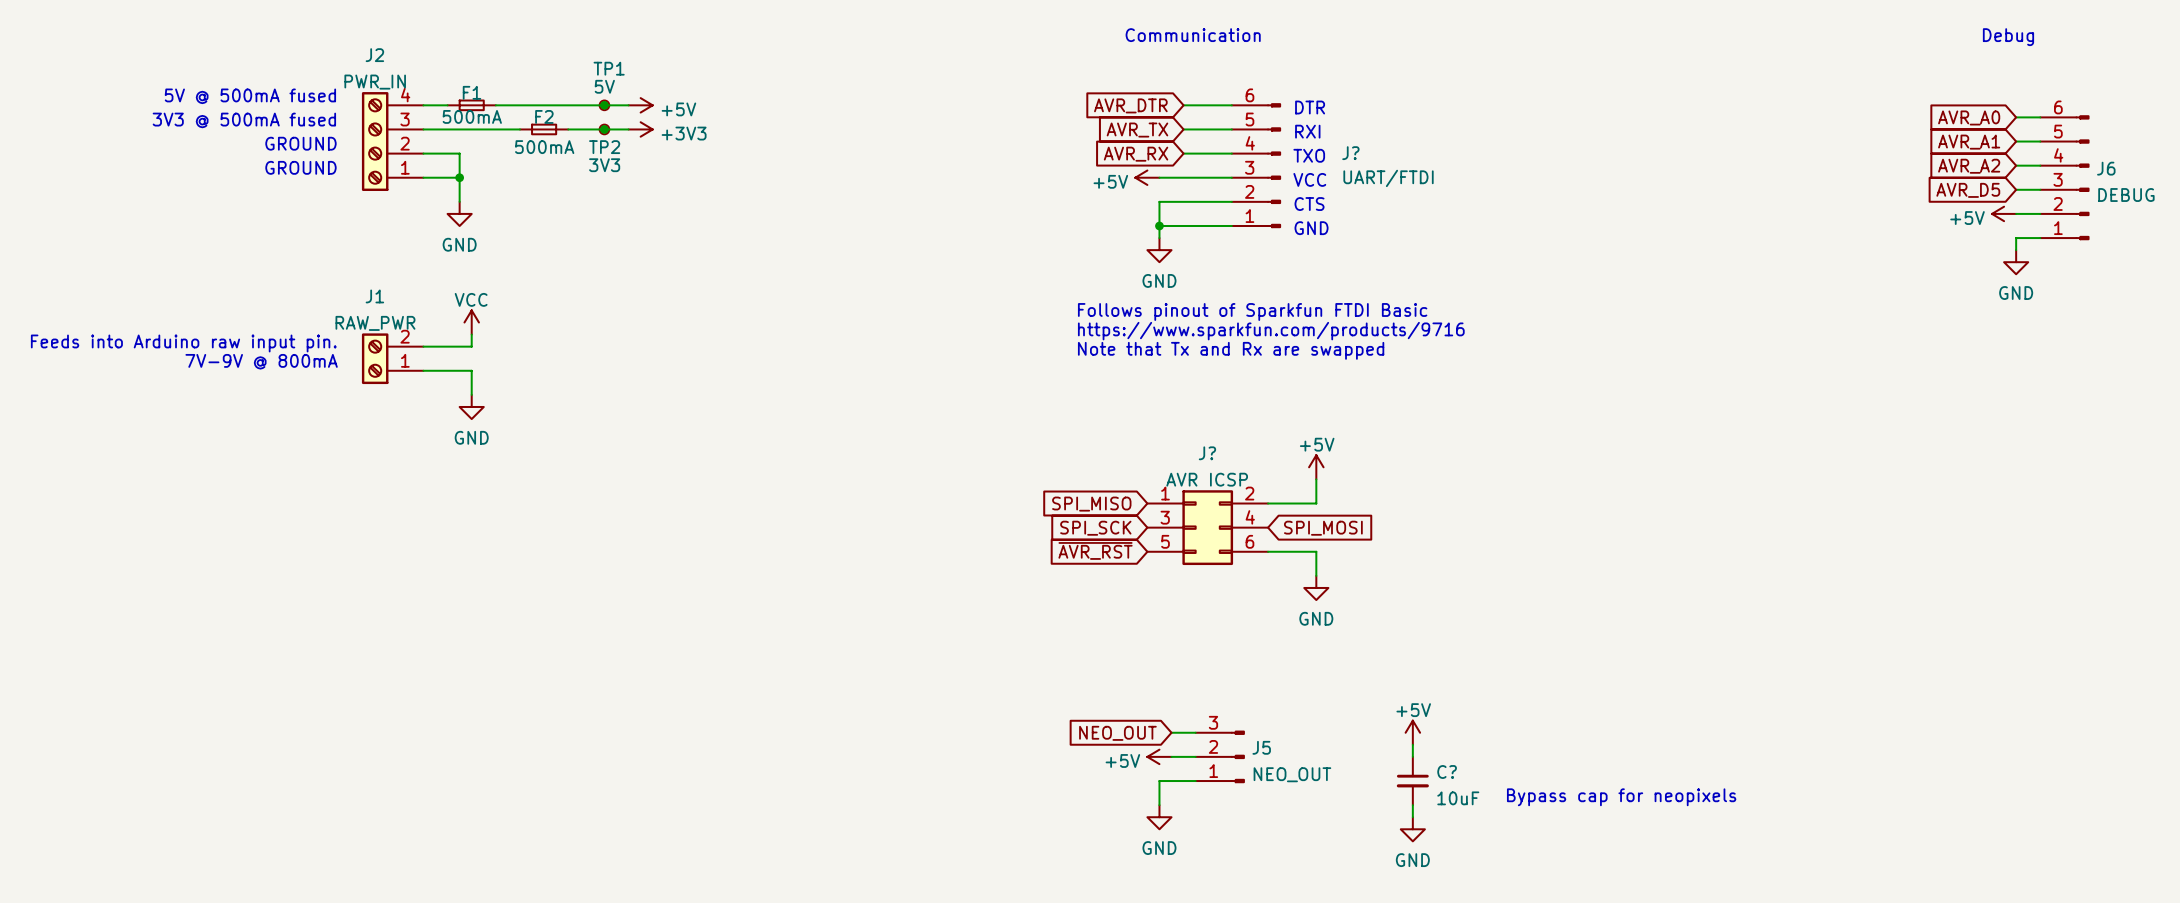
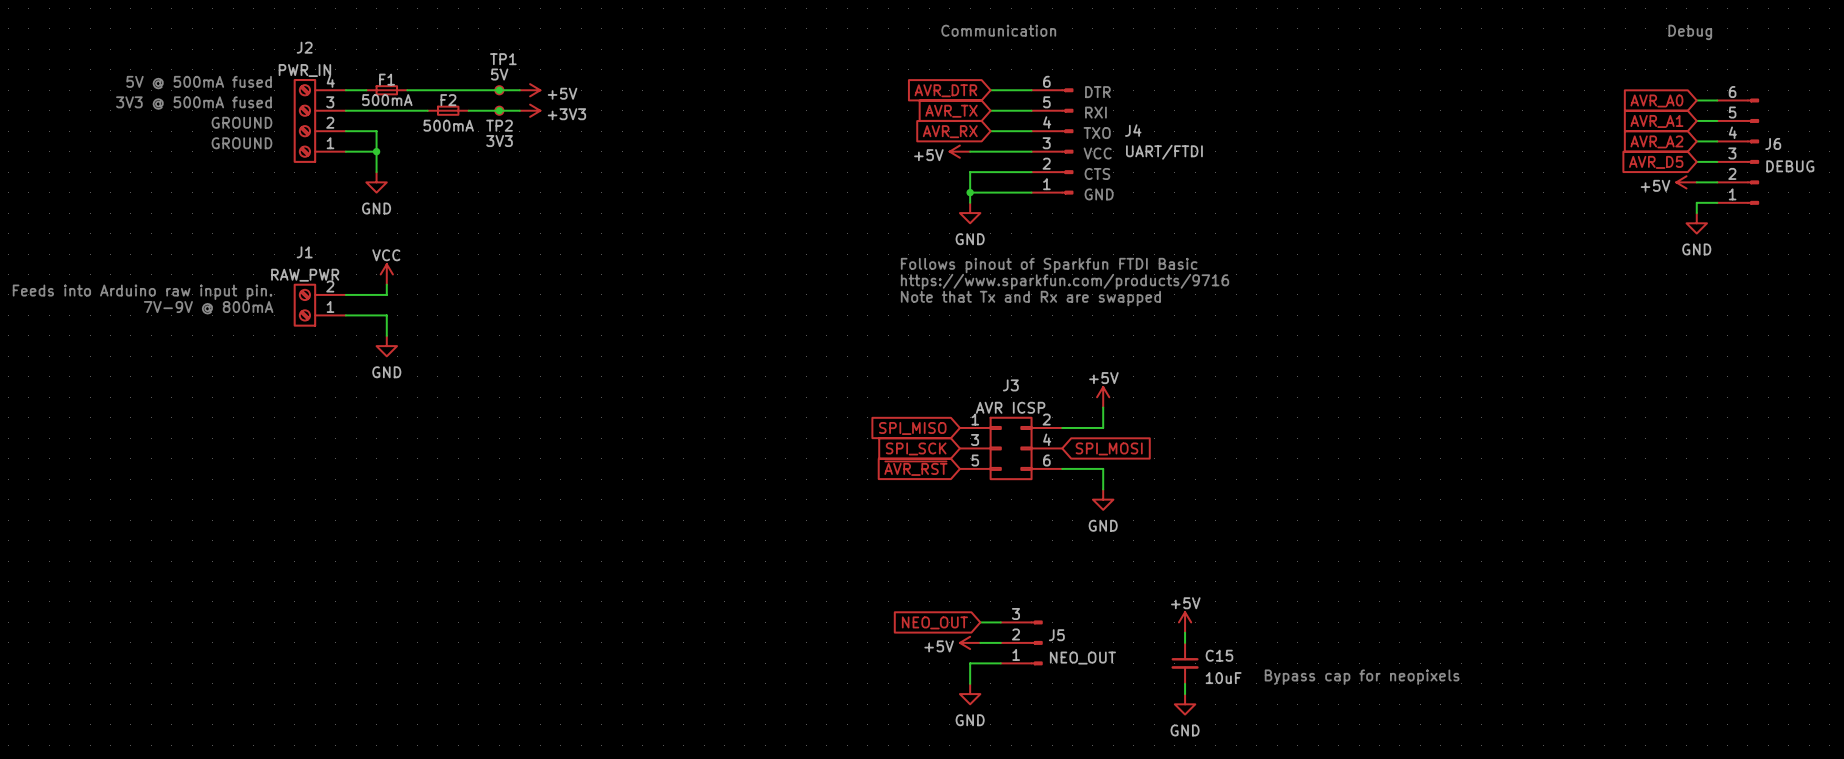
J? name: J? (1350, 153) -> J4 (1133, 130)
J? name: J? (1207, 453) -> J3 (1010, 385)
C? name: C? (1447, 772) -> C15 (1219, 655)

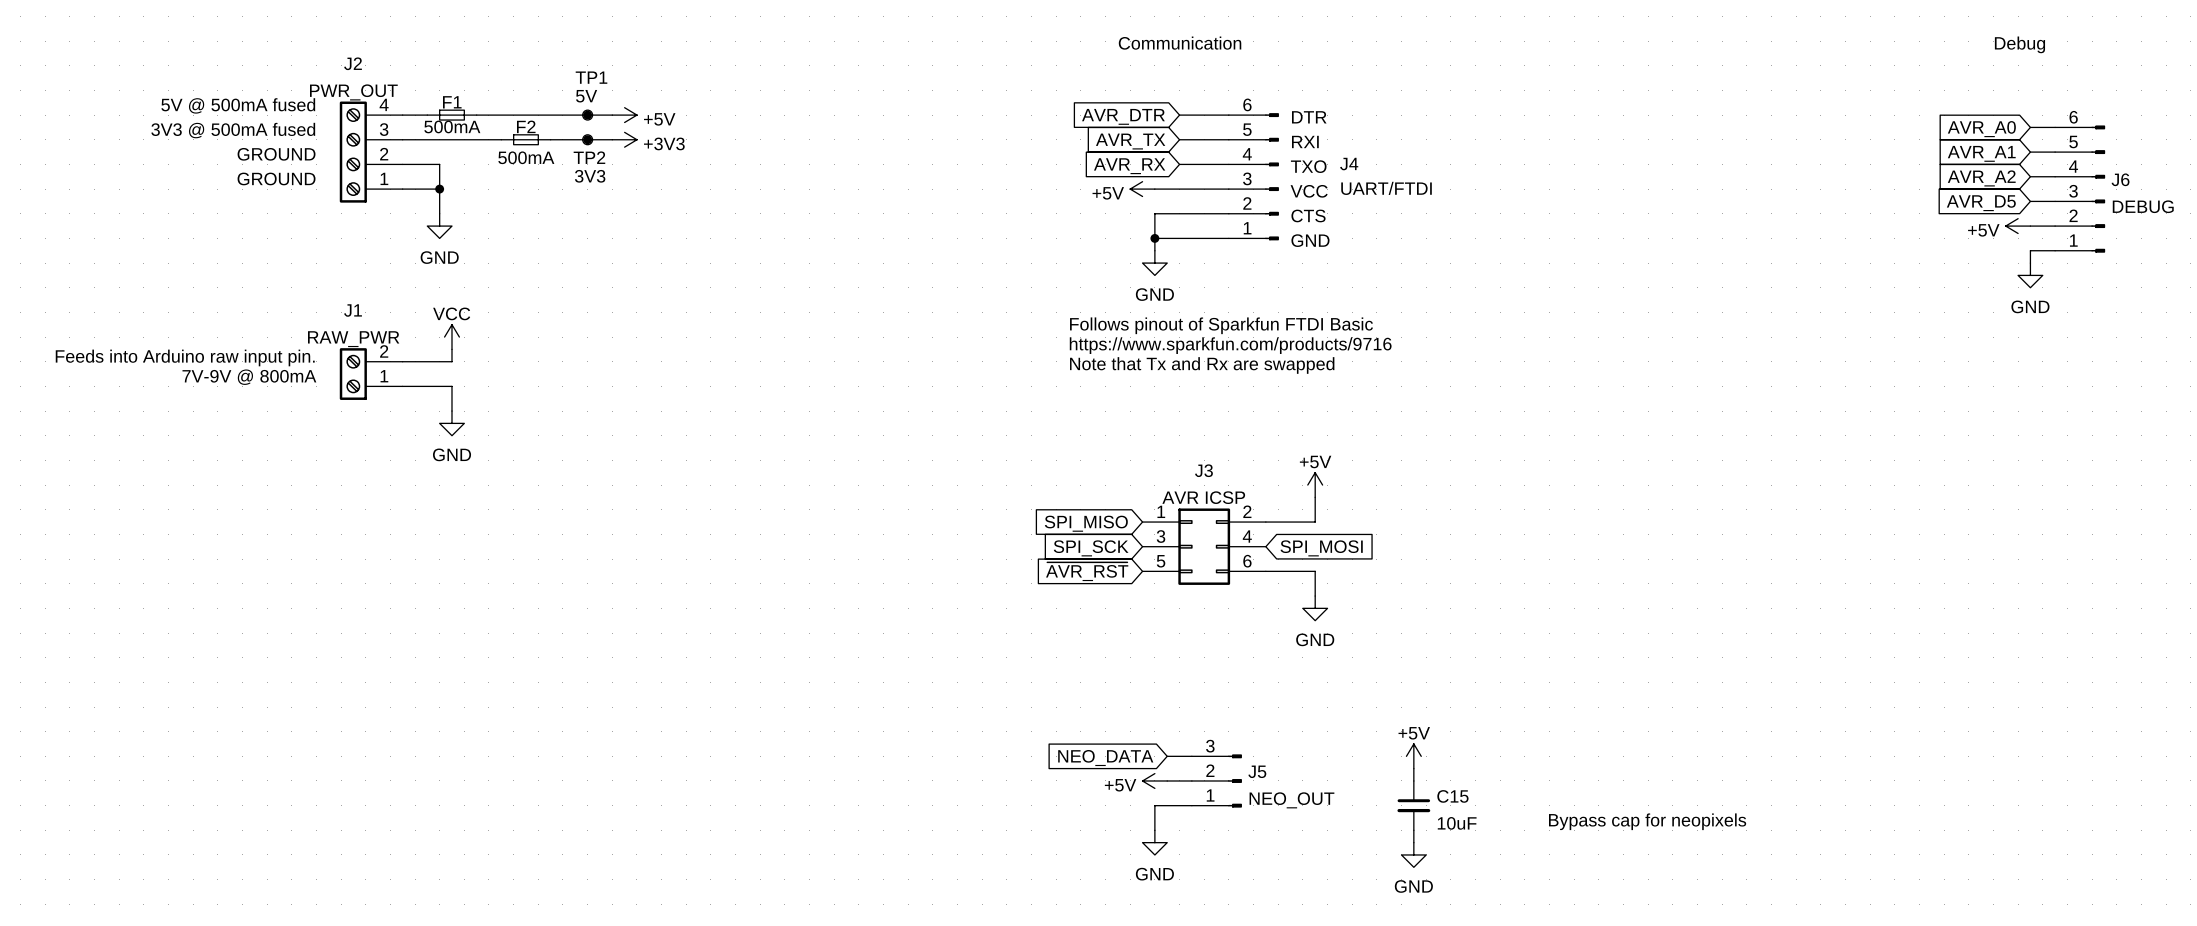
J2 value: PWR_IN (304, 70) -> PWR_OUT (353, 92)
global label: NEO_OUT (934, 622) -> NEO_DATA (1105, 758)

